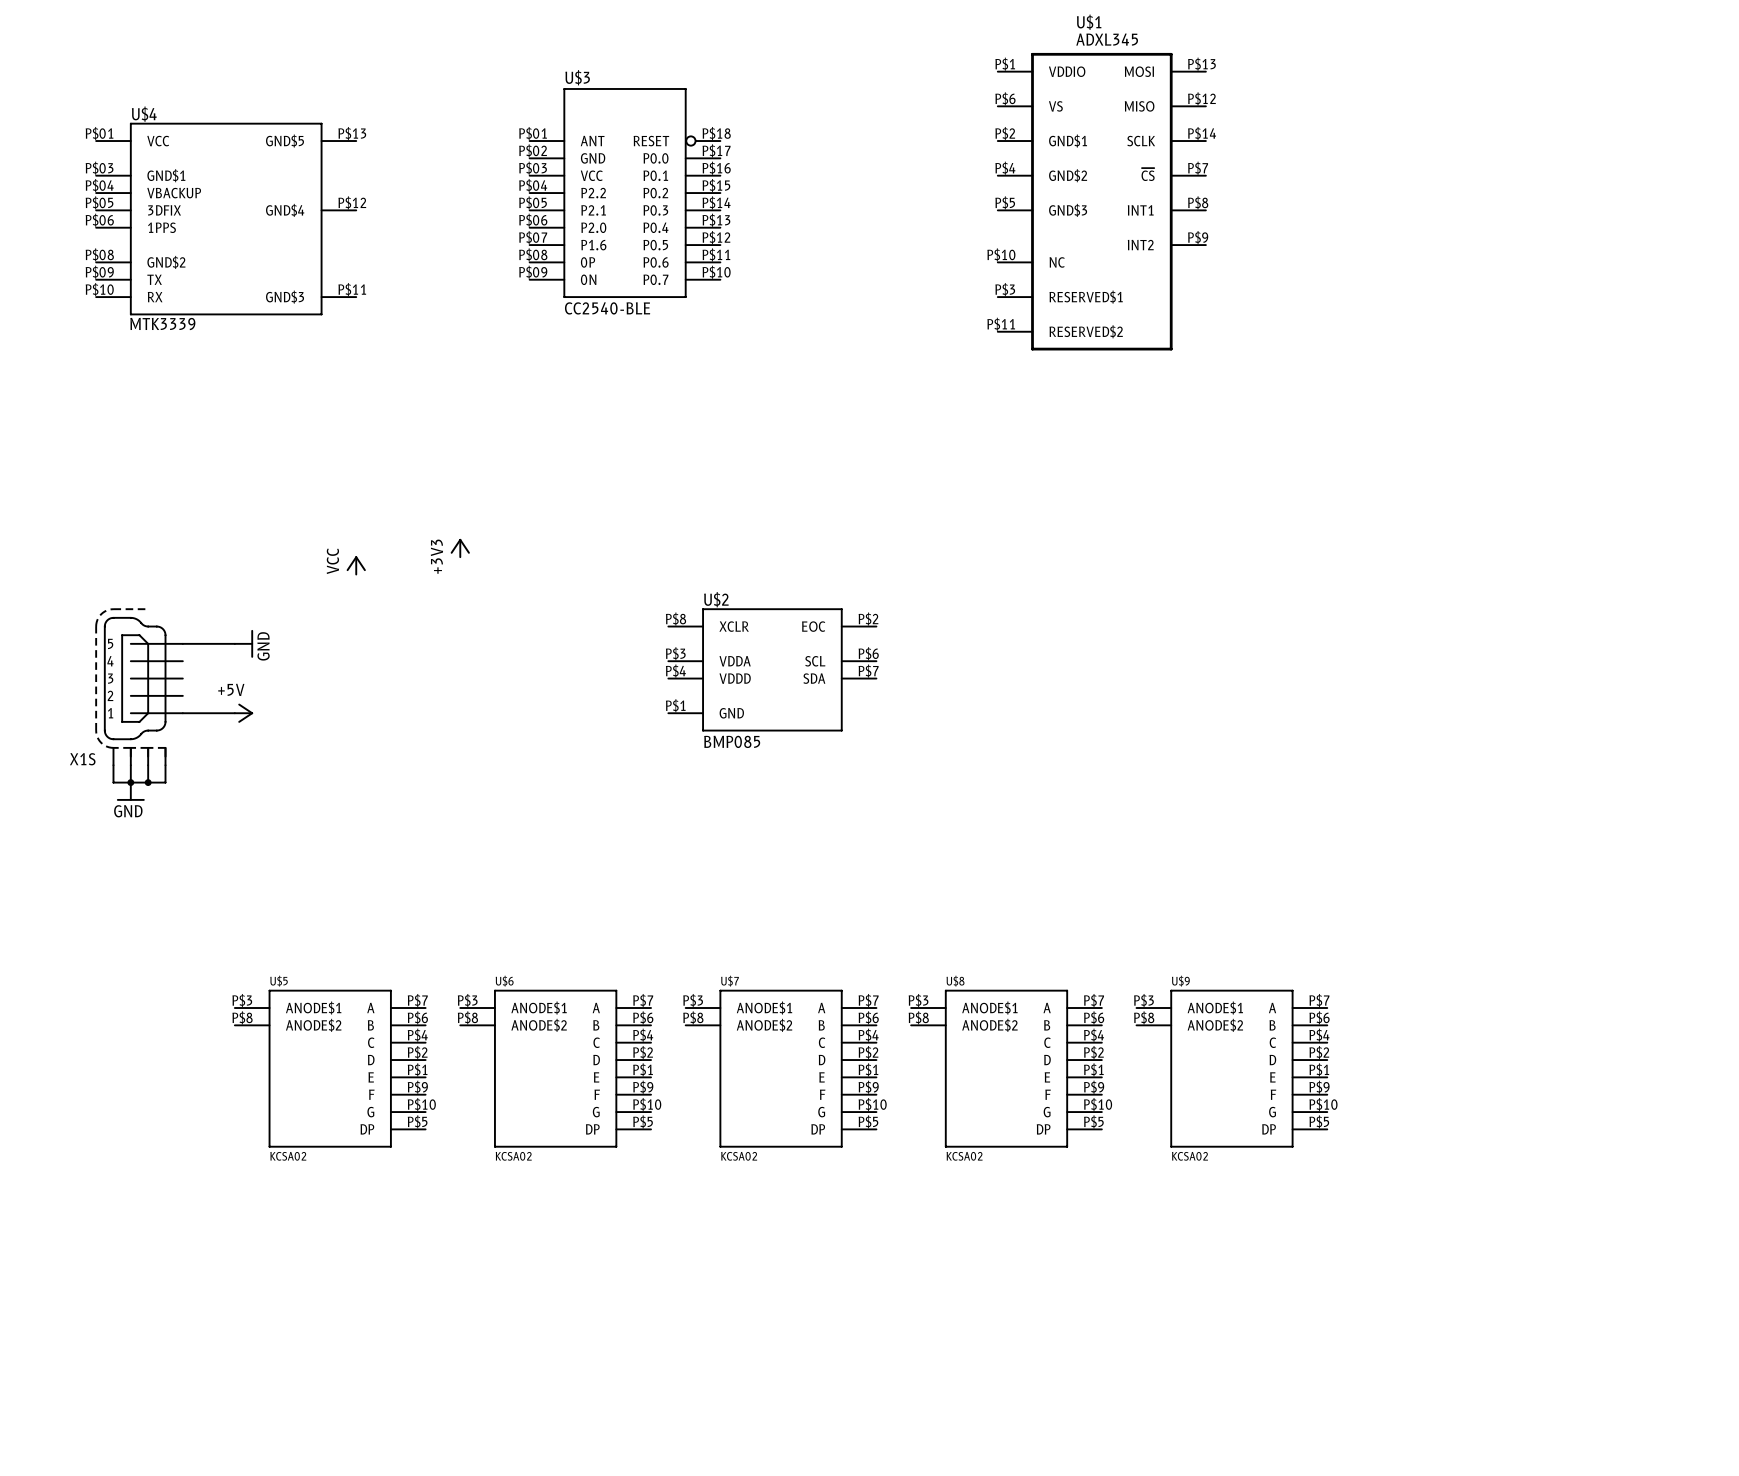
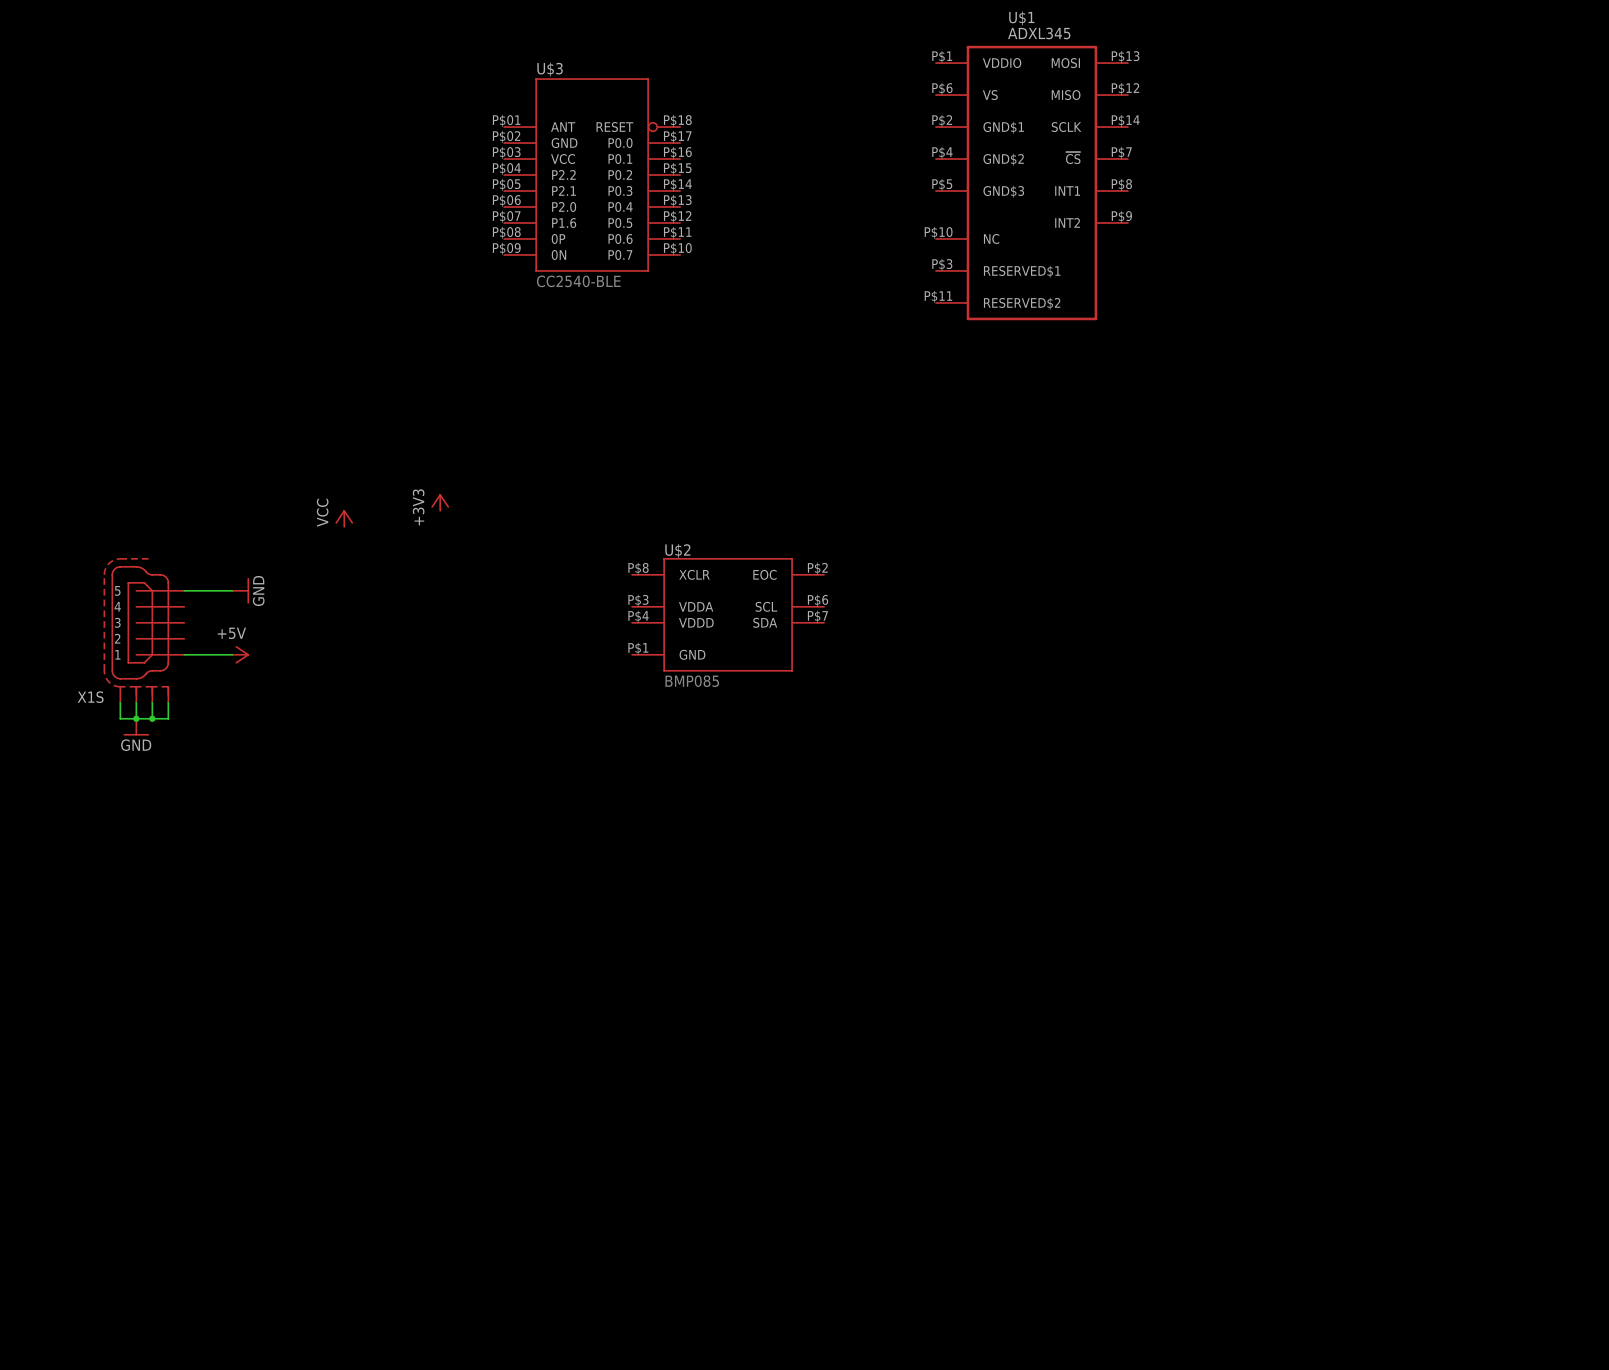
U$4: (226, 219) -> none
U$5: (330, 1068) -> none
U$6: (555, 1068) -> none
U$7: (781, 1068) -> none
U$8: (1006, 1068) -> none
U$9: (1231, 1068) -> none

